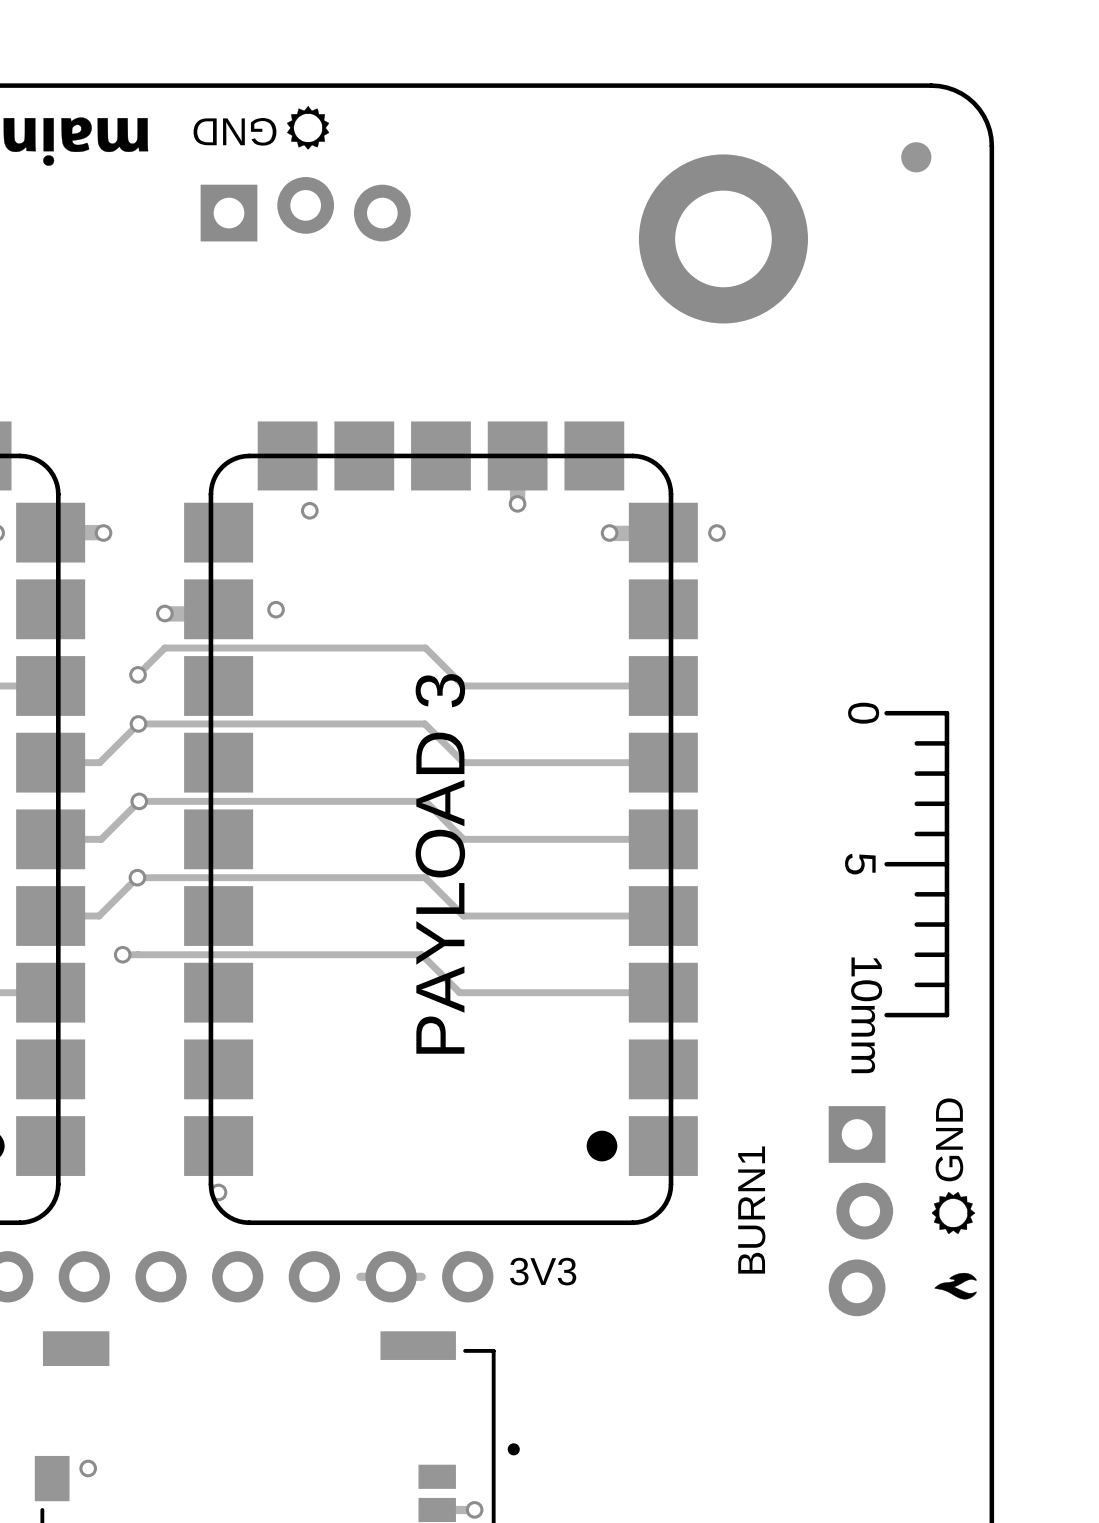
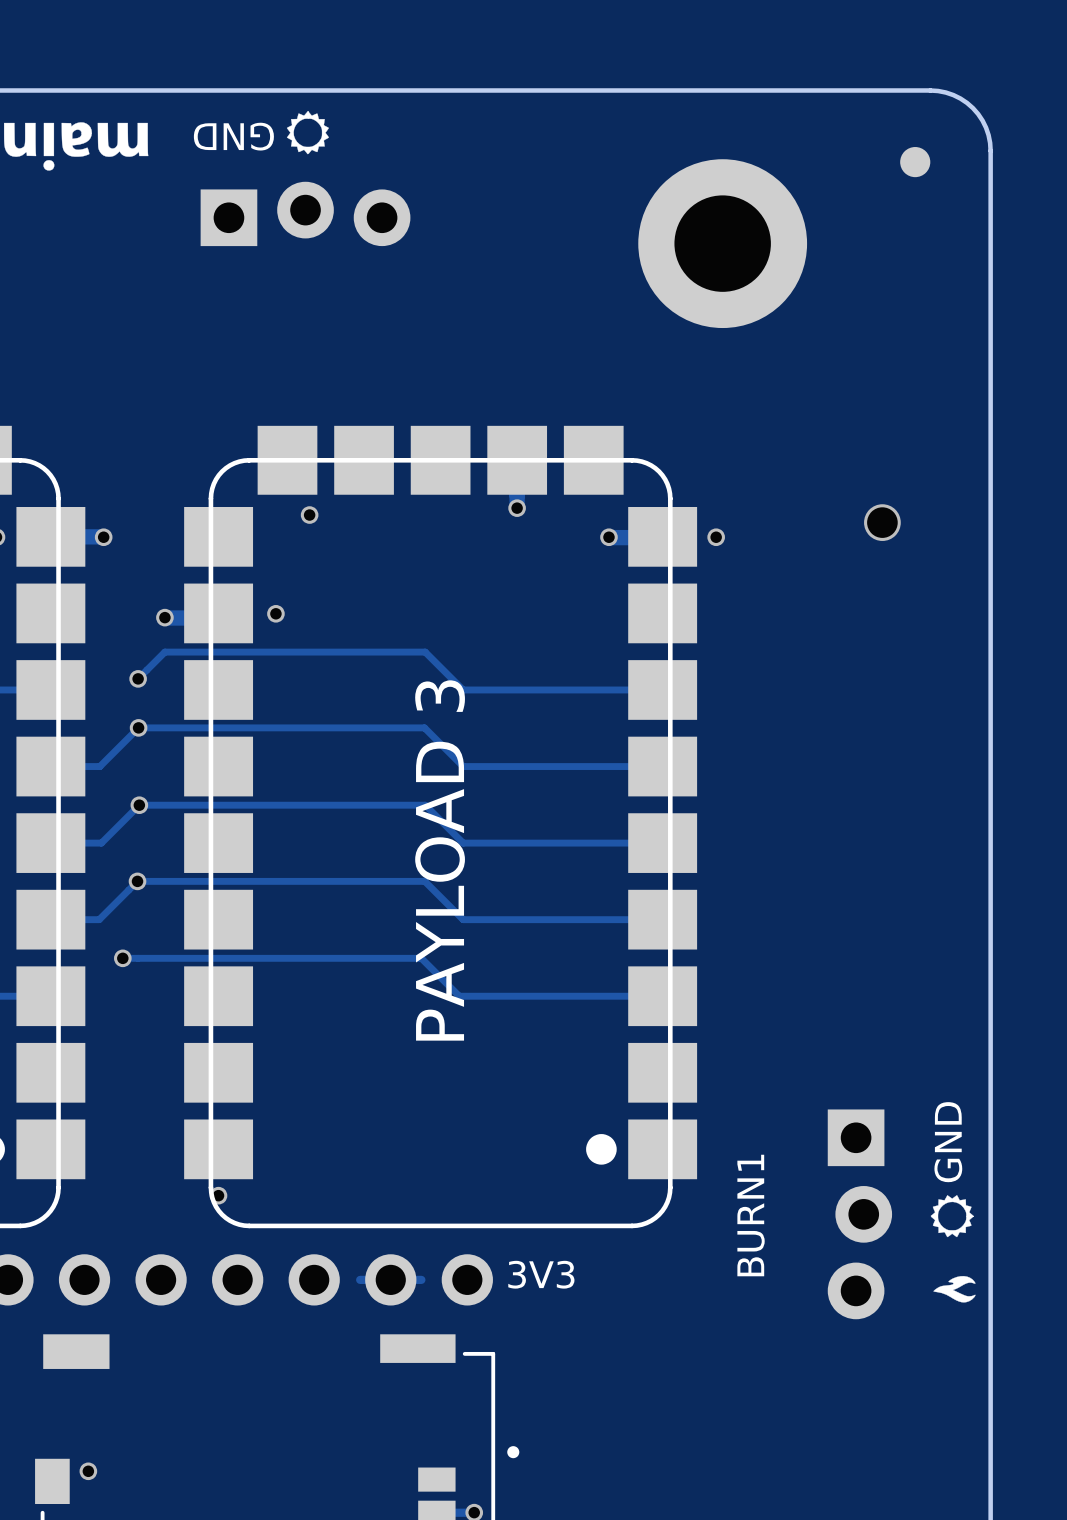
via: none -> (882, 522)
drawing: [884, 710, 950, 1018] -> none

